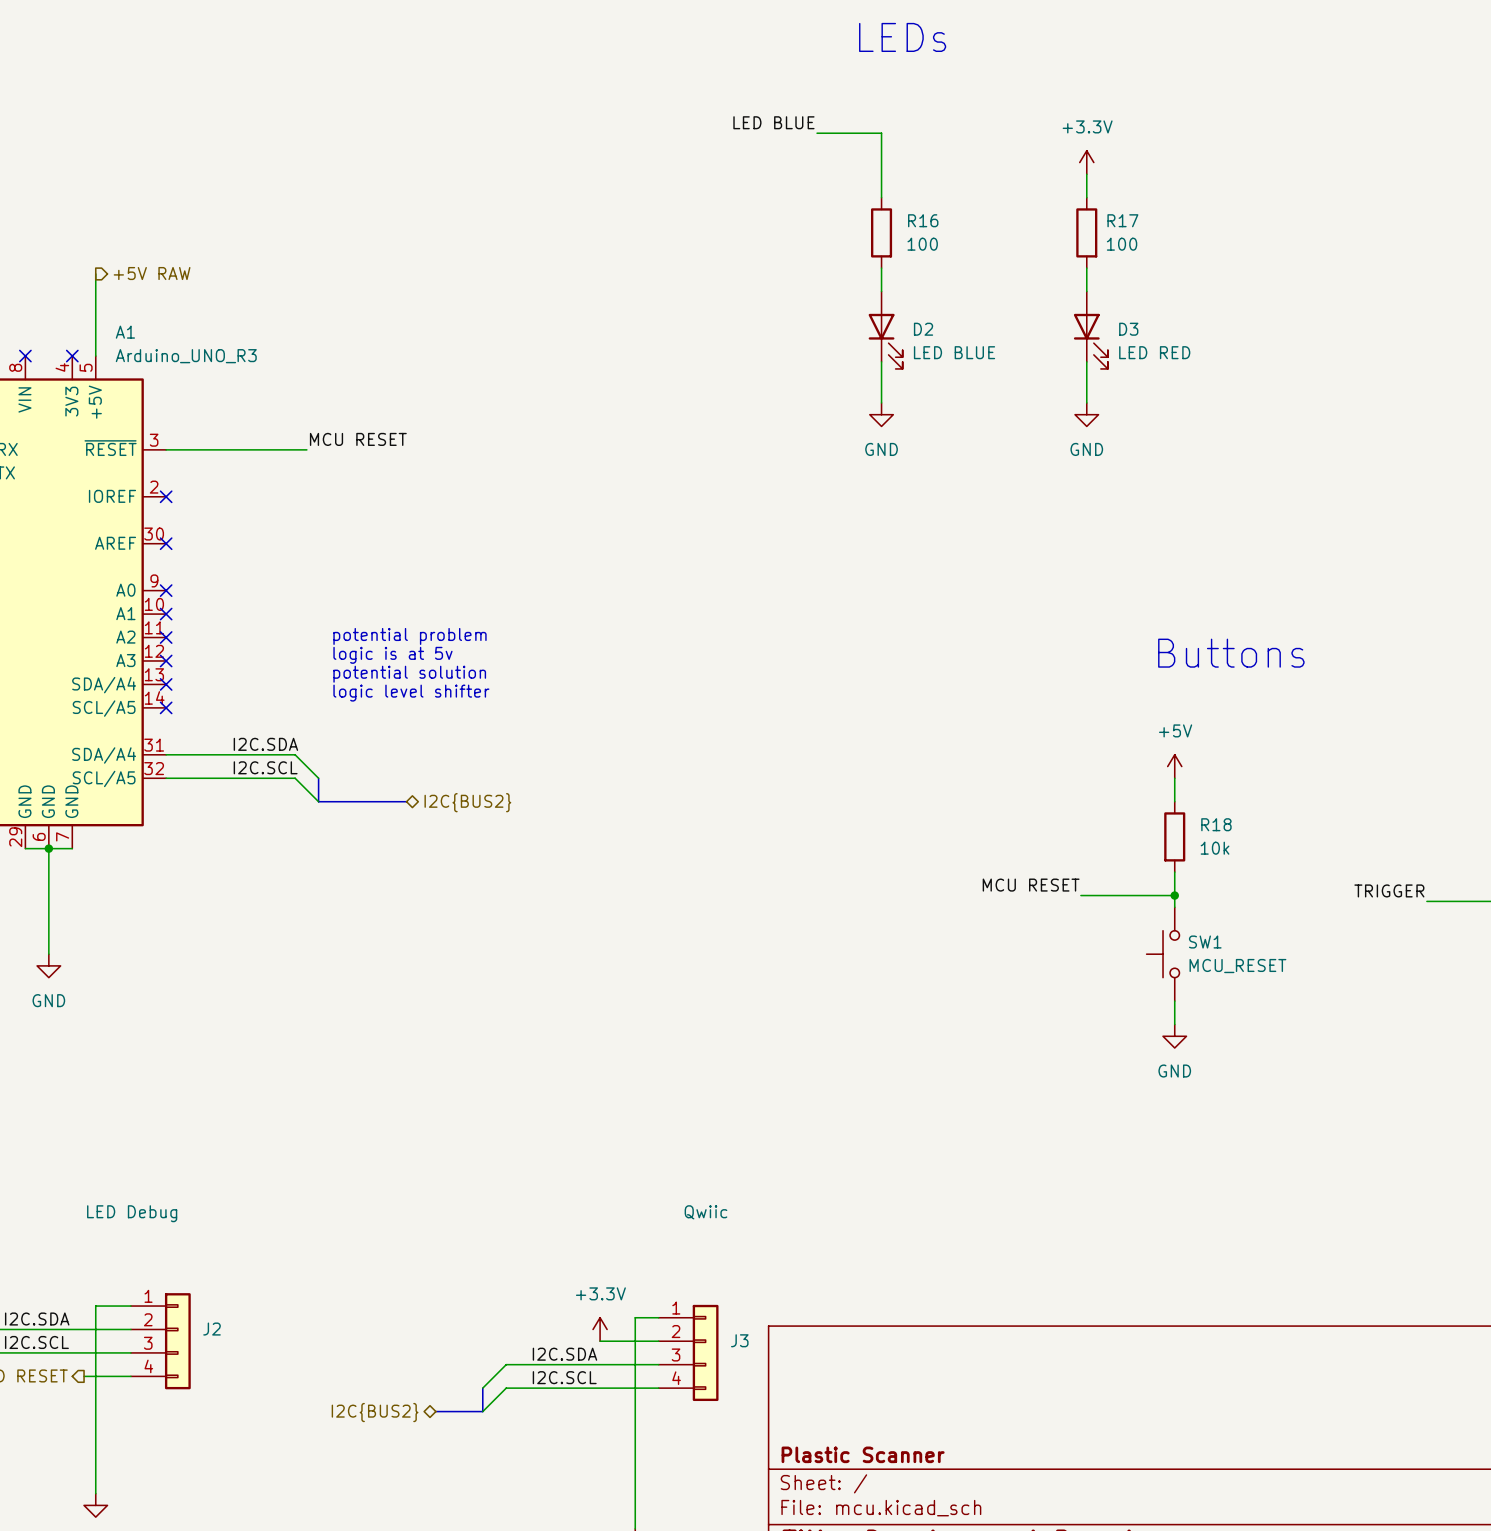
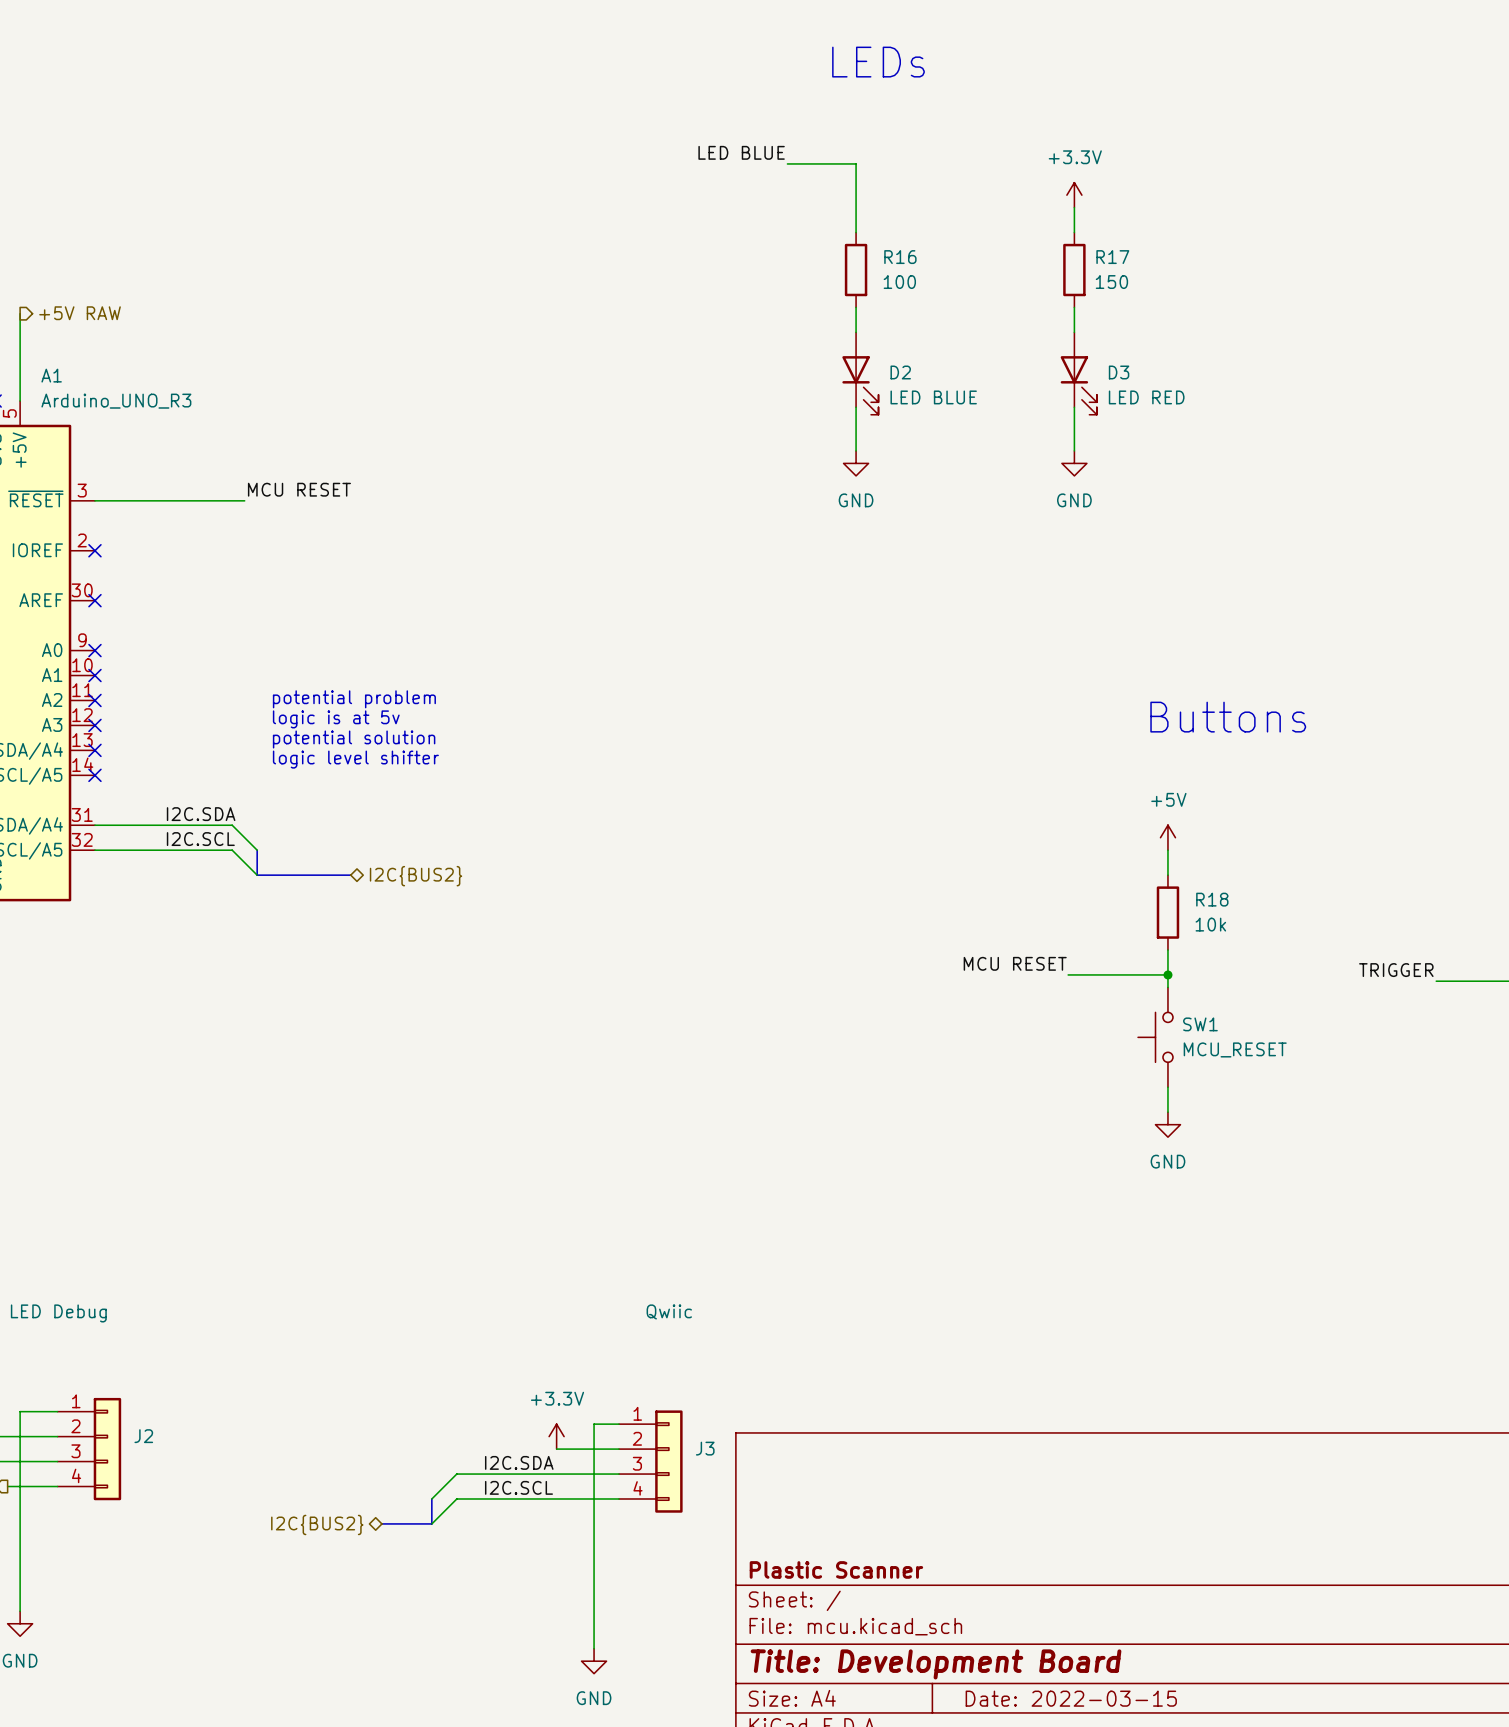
R17 value: 100 (1122, 244) -> 150 (1111, 282)

